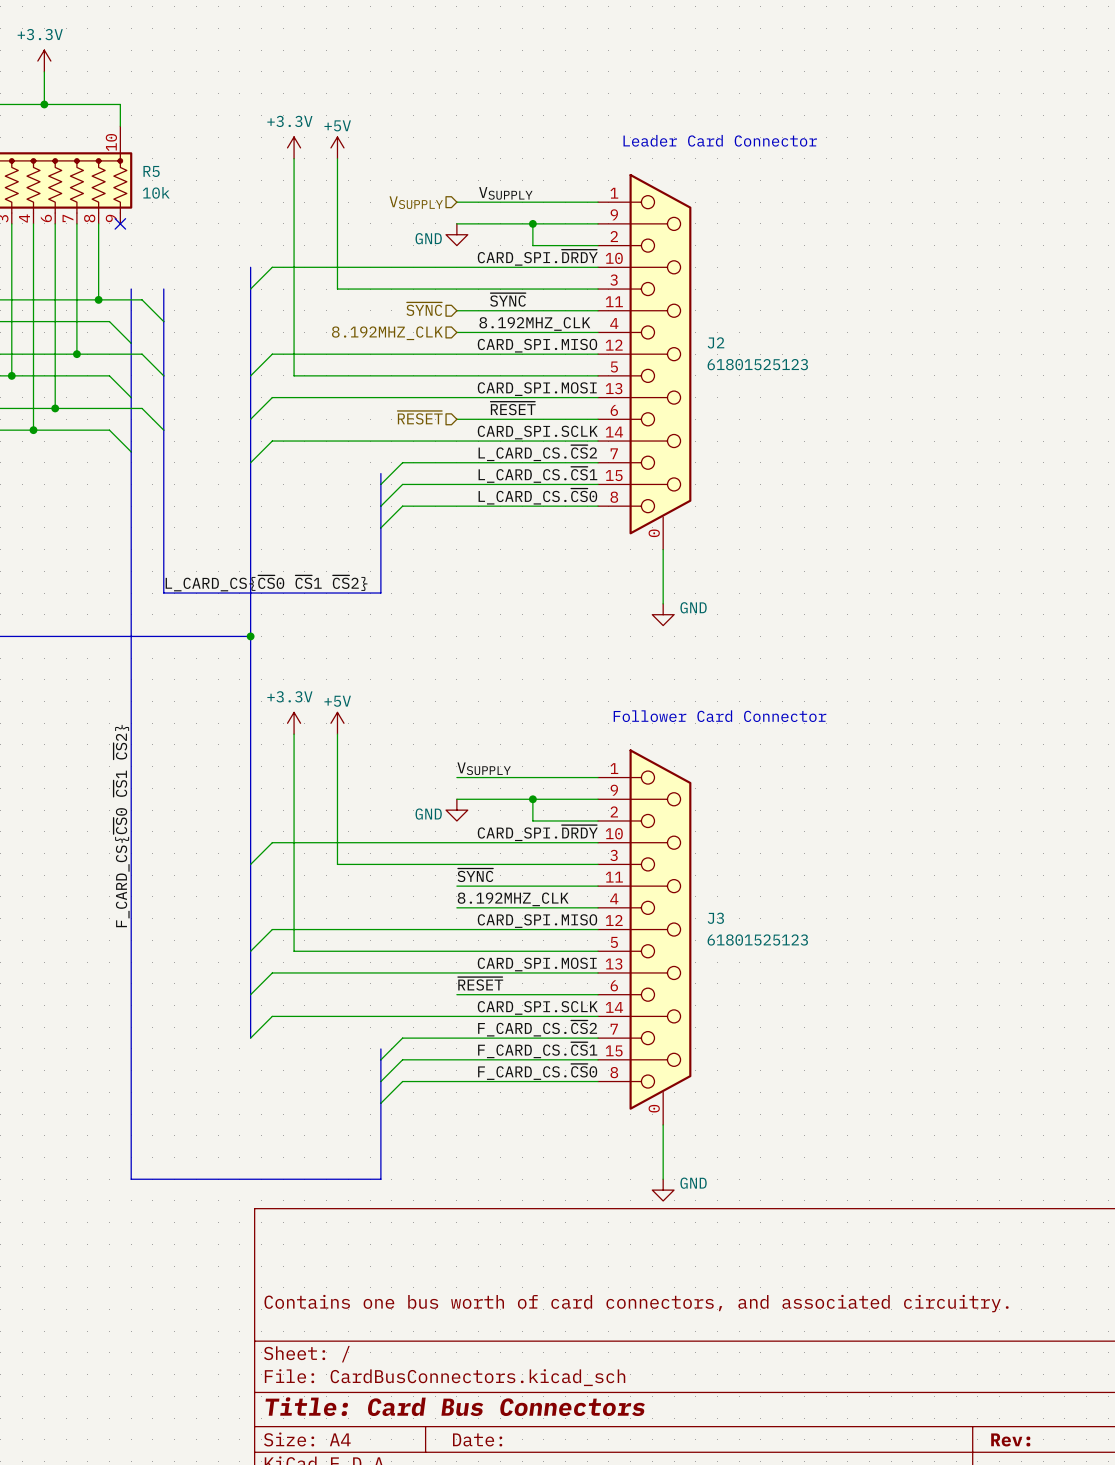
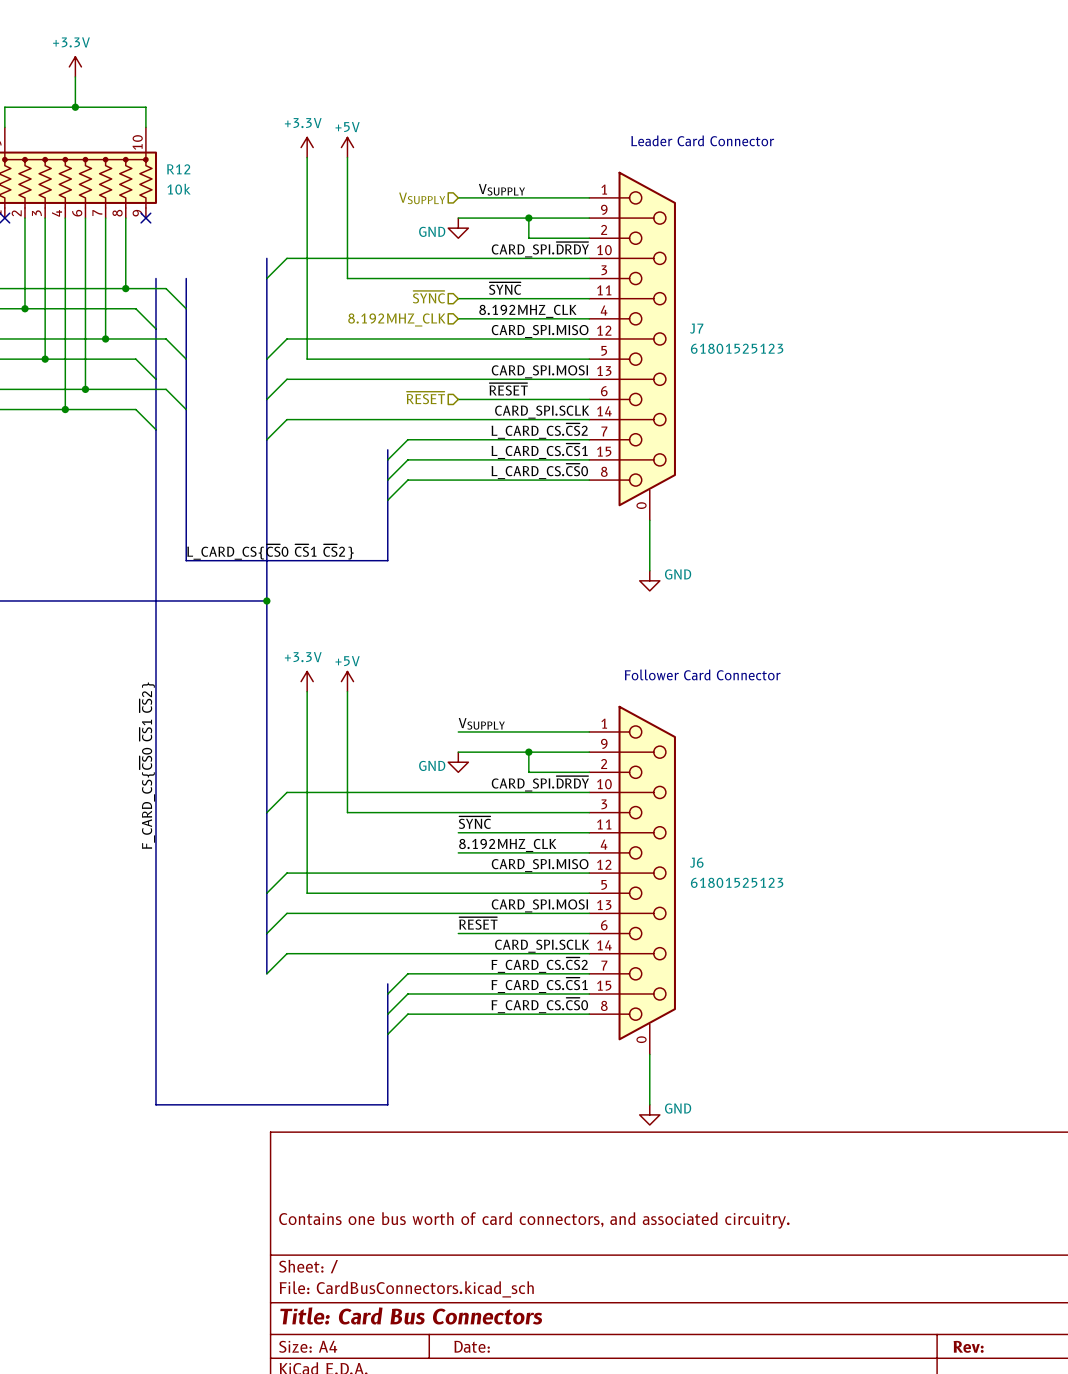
R5 name: R5 (151, 171) -> R12 (178, 169)
J2 name: J2 (716, 342) -> J7 (696, 328)
J3 name: J3 (715, 918) -> J6 (696, 862)

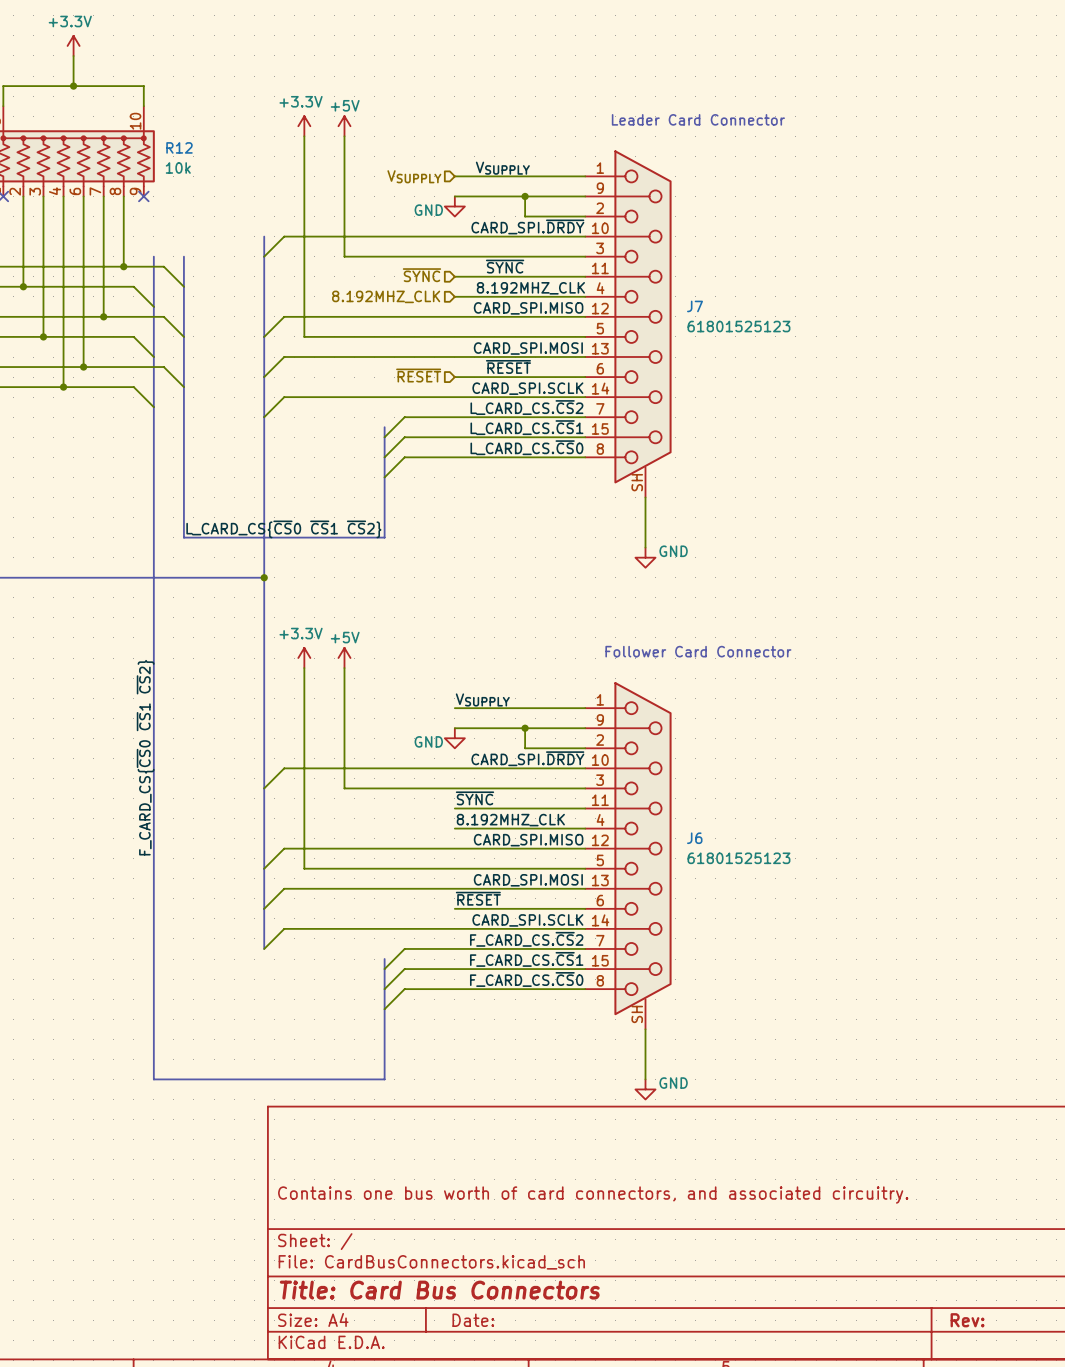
J7 pin number: 0 (641, 505) -> SH (637, 482)
J6 pin number: 0 (641, 1039) -> SH (637, 1014)

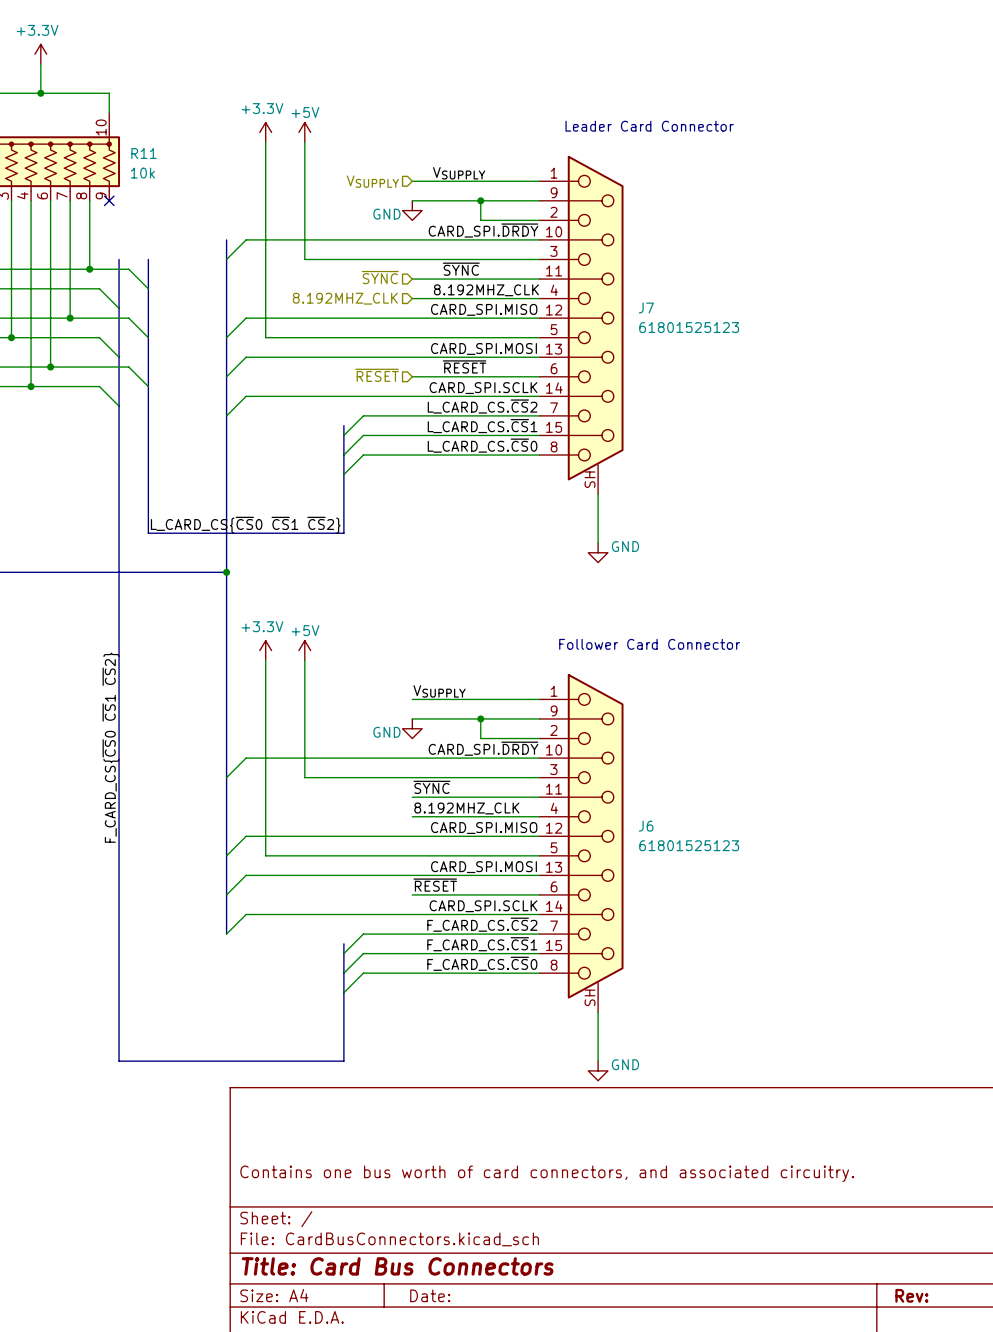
R12 name: R12 (179, 147) -> R11 (144, 153)

